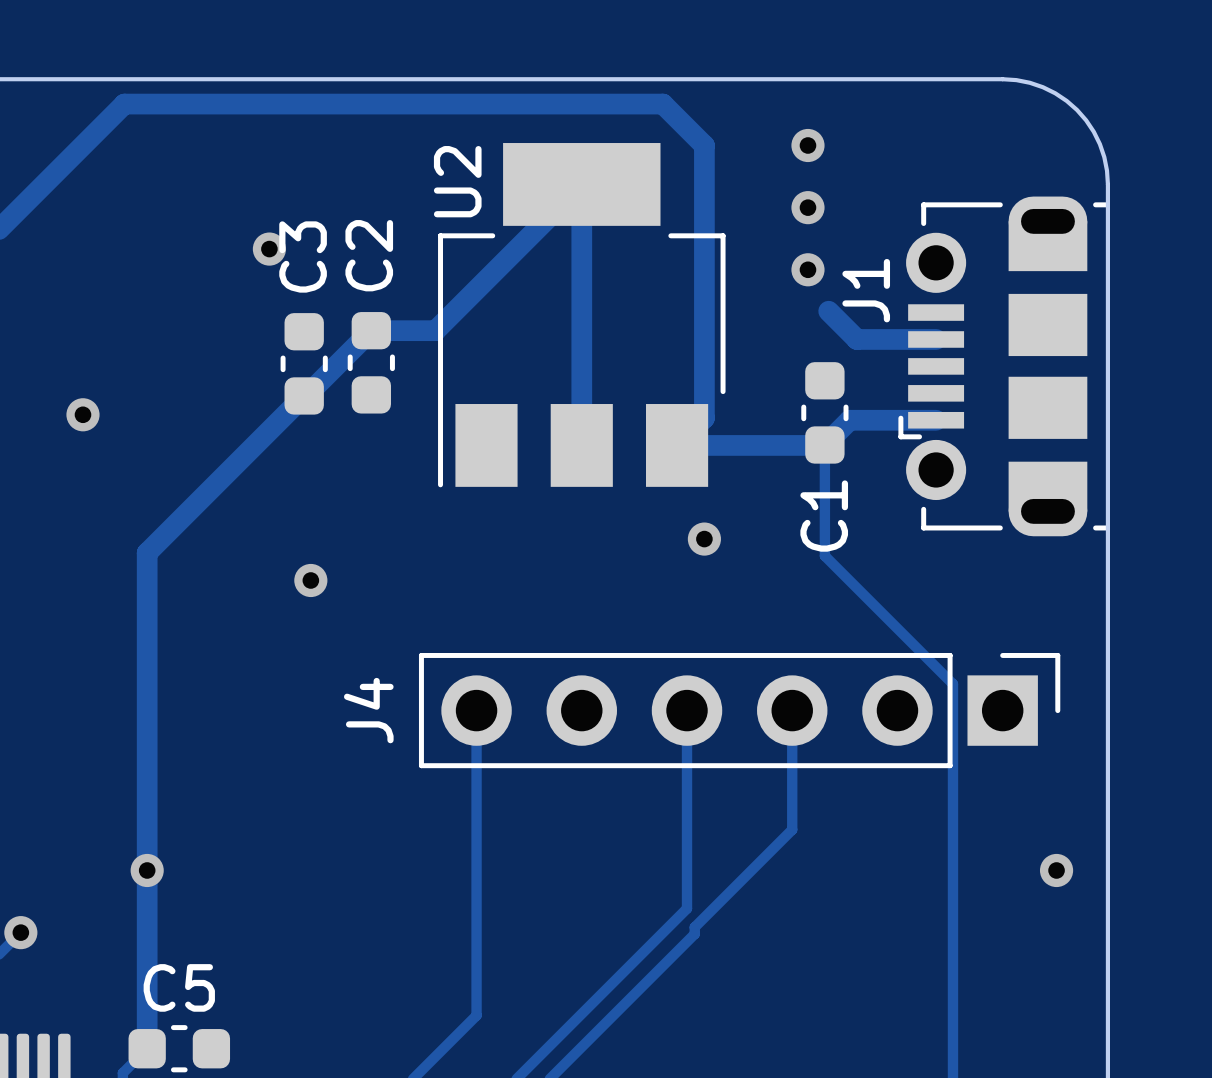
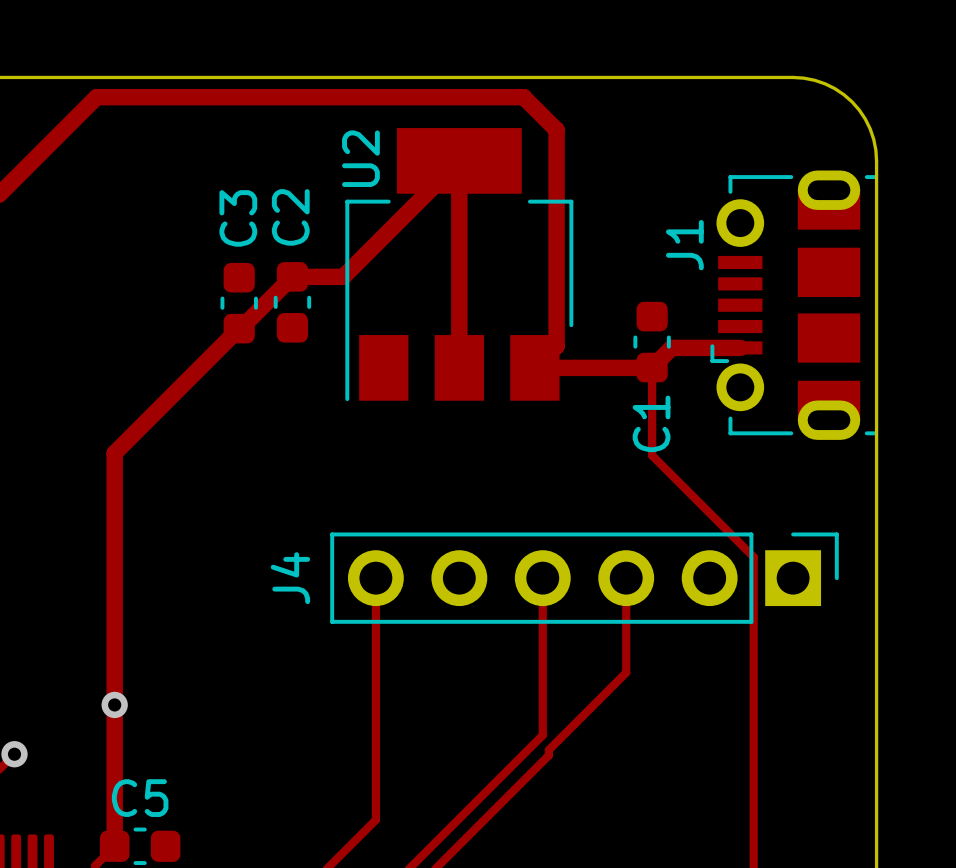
via: (807, 145) -> none
via: (807, 207) -> none
via: (269, 249) -> none
via: (807, 269) -> none
track: (828, 311) (856, 339) (936, 339) -> none
via: (82, 414) -> none
via: (704, 539) -> none
via: (310, 580) -> none
via: (1056, 870) -> none

